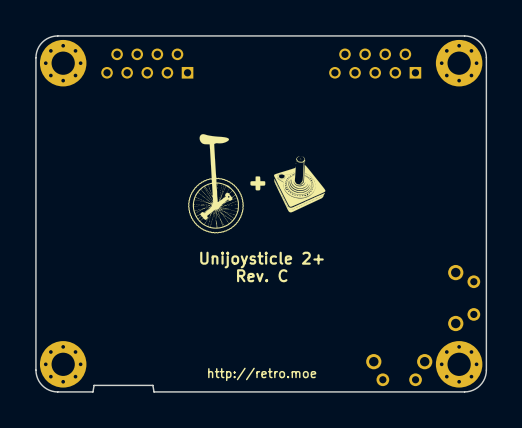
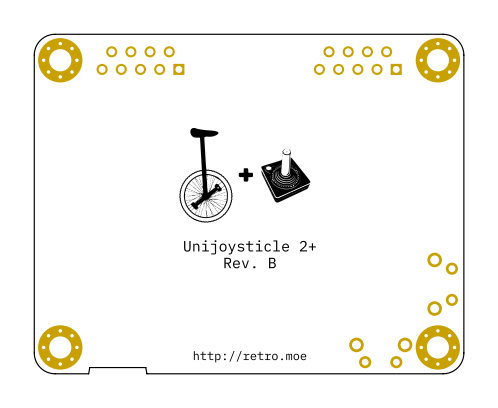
text: Rev. C (262, 275) -> Rev. B (250, 263)

